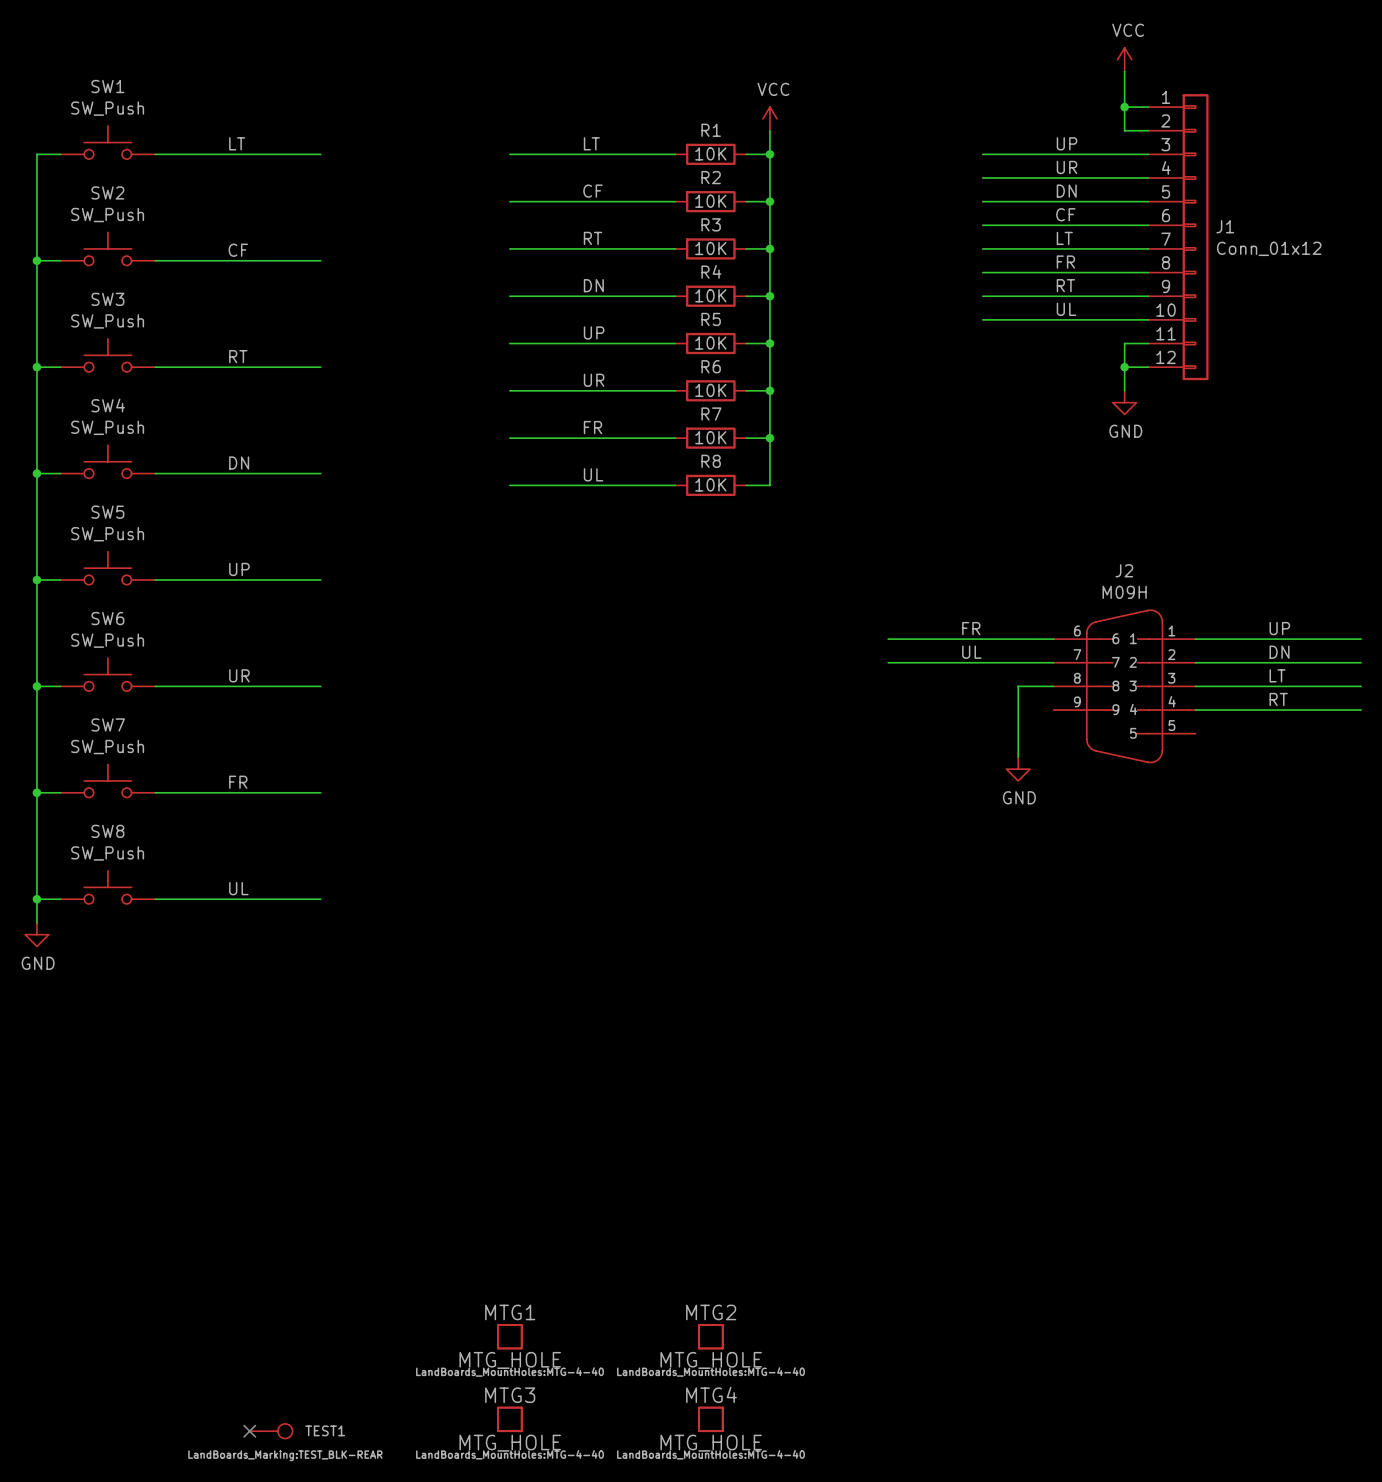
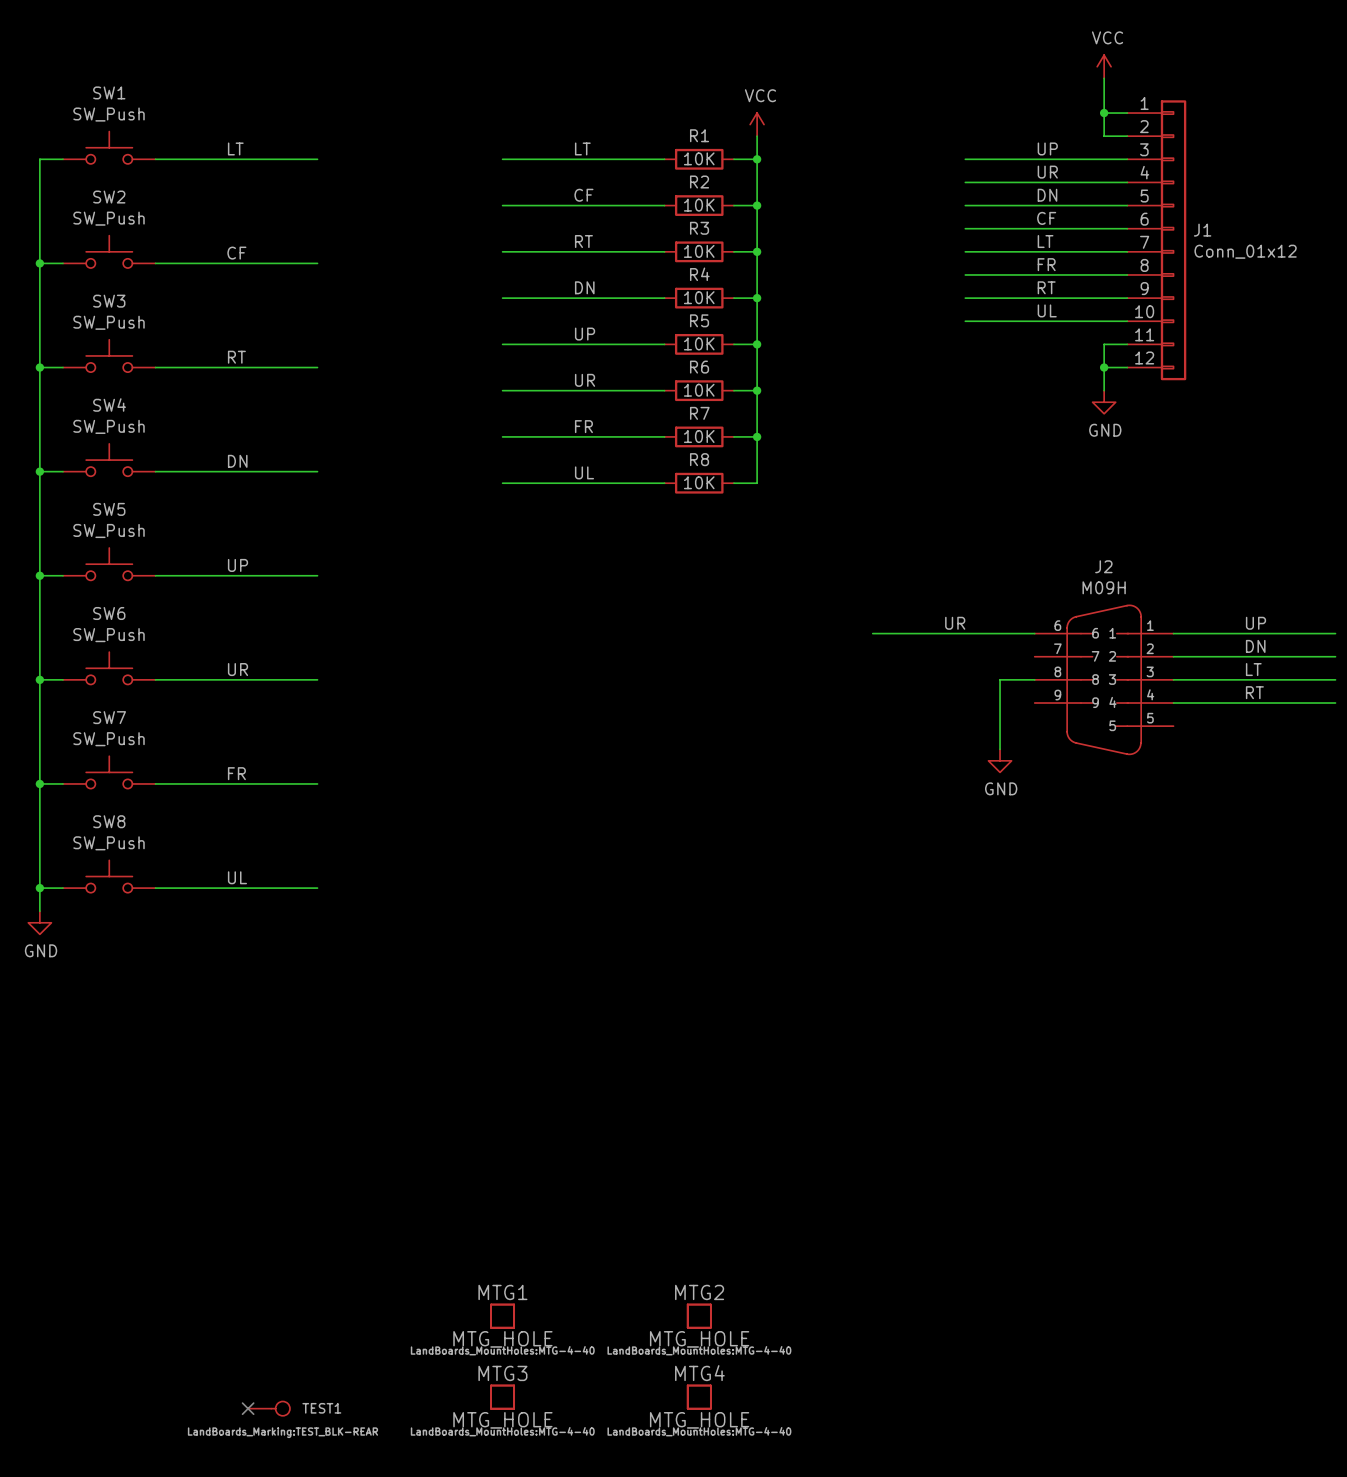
label: FR (971, 628) -> UR (955, 623)
label: UL (971, 652) -> none
wire: (888, 662) (1053, 662) -> none

